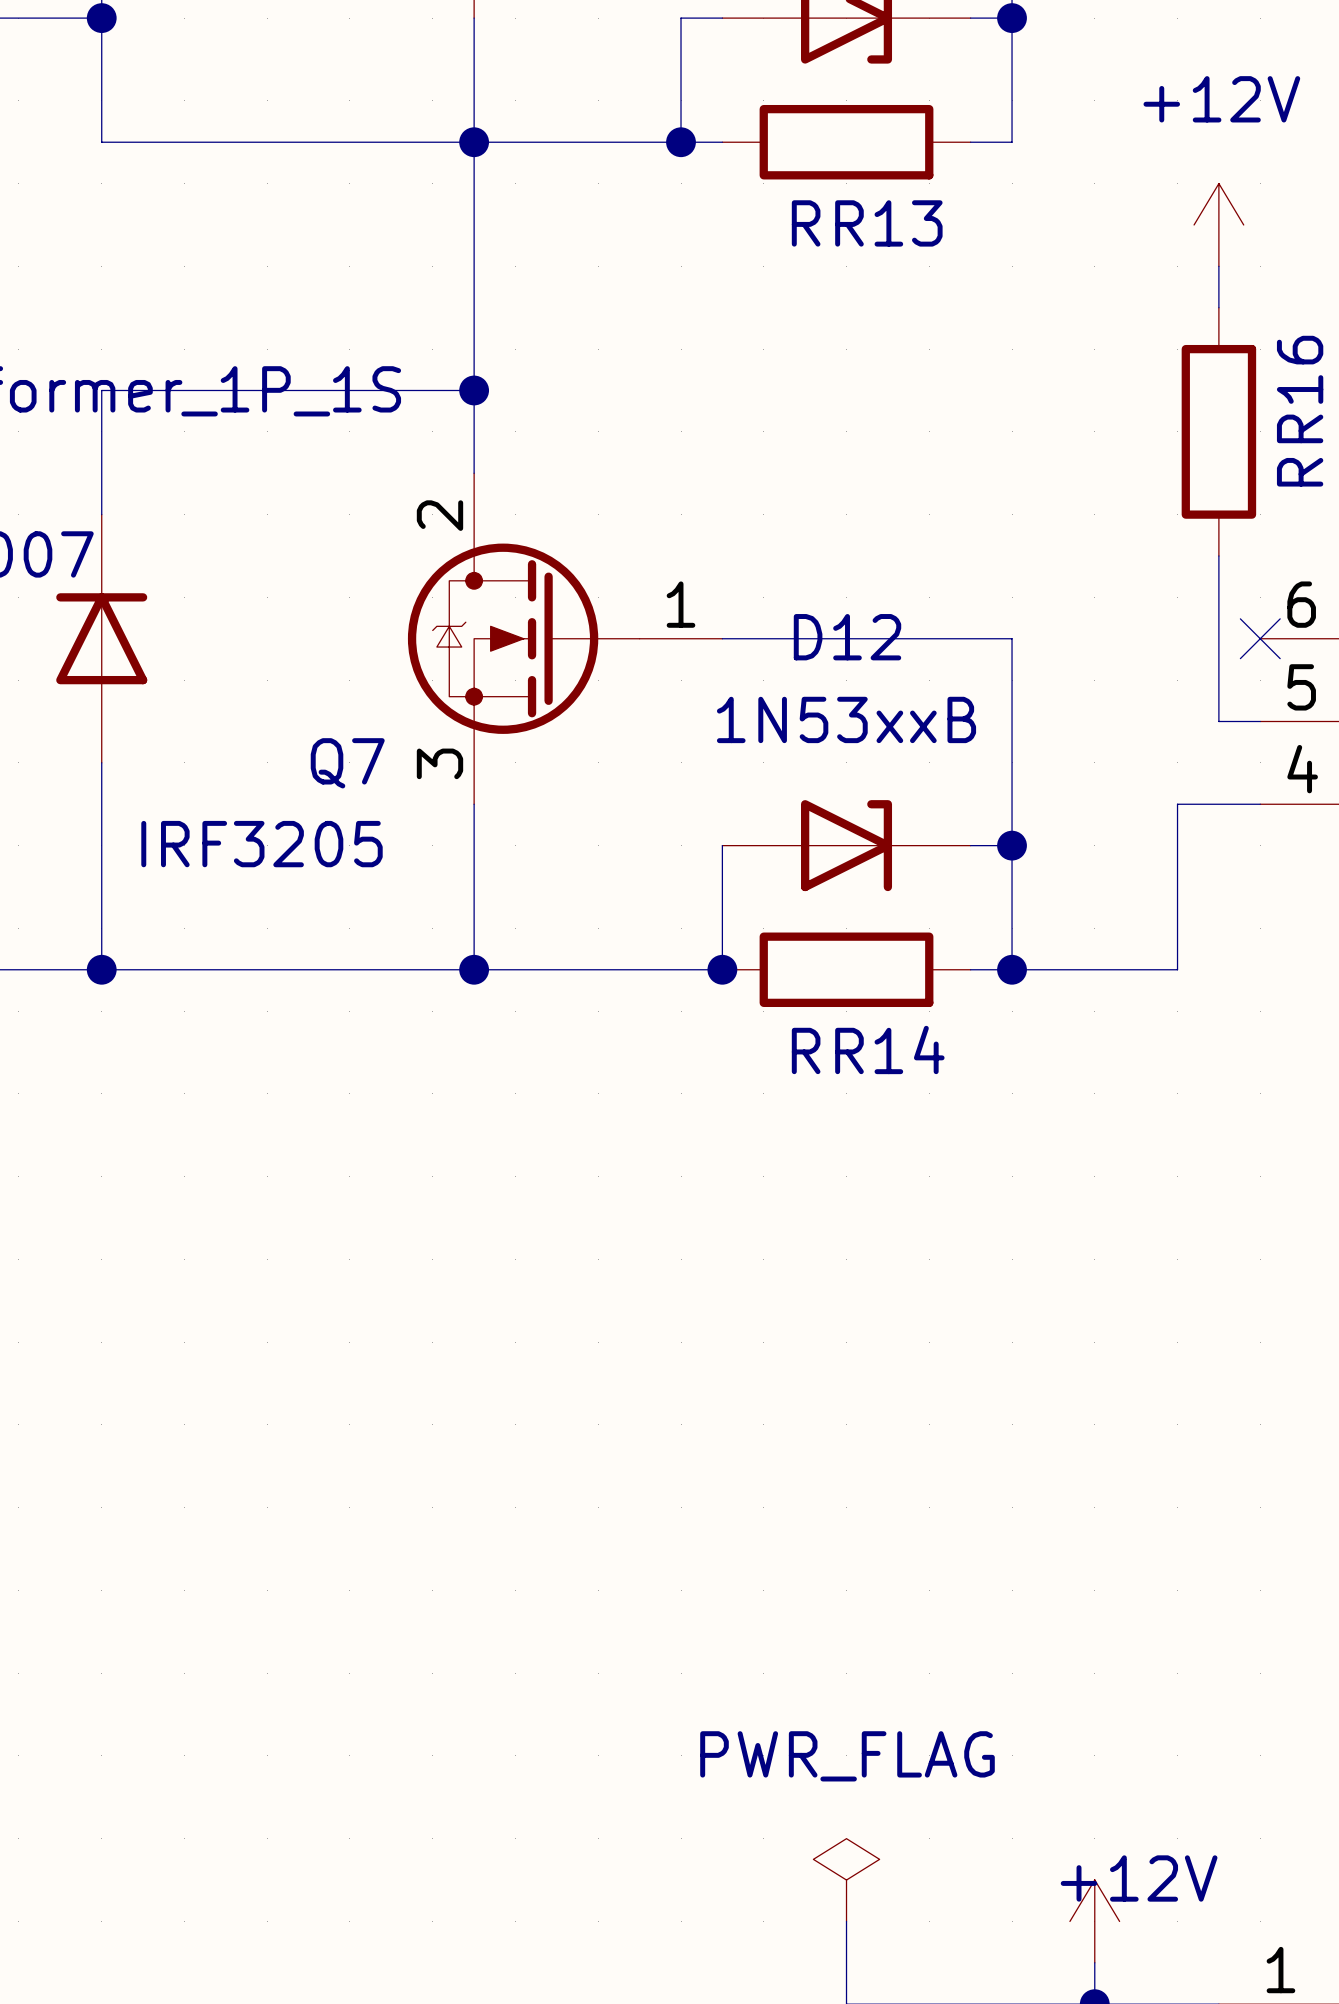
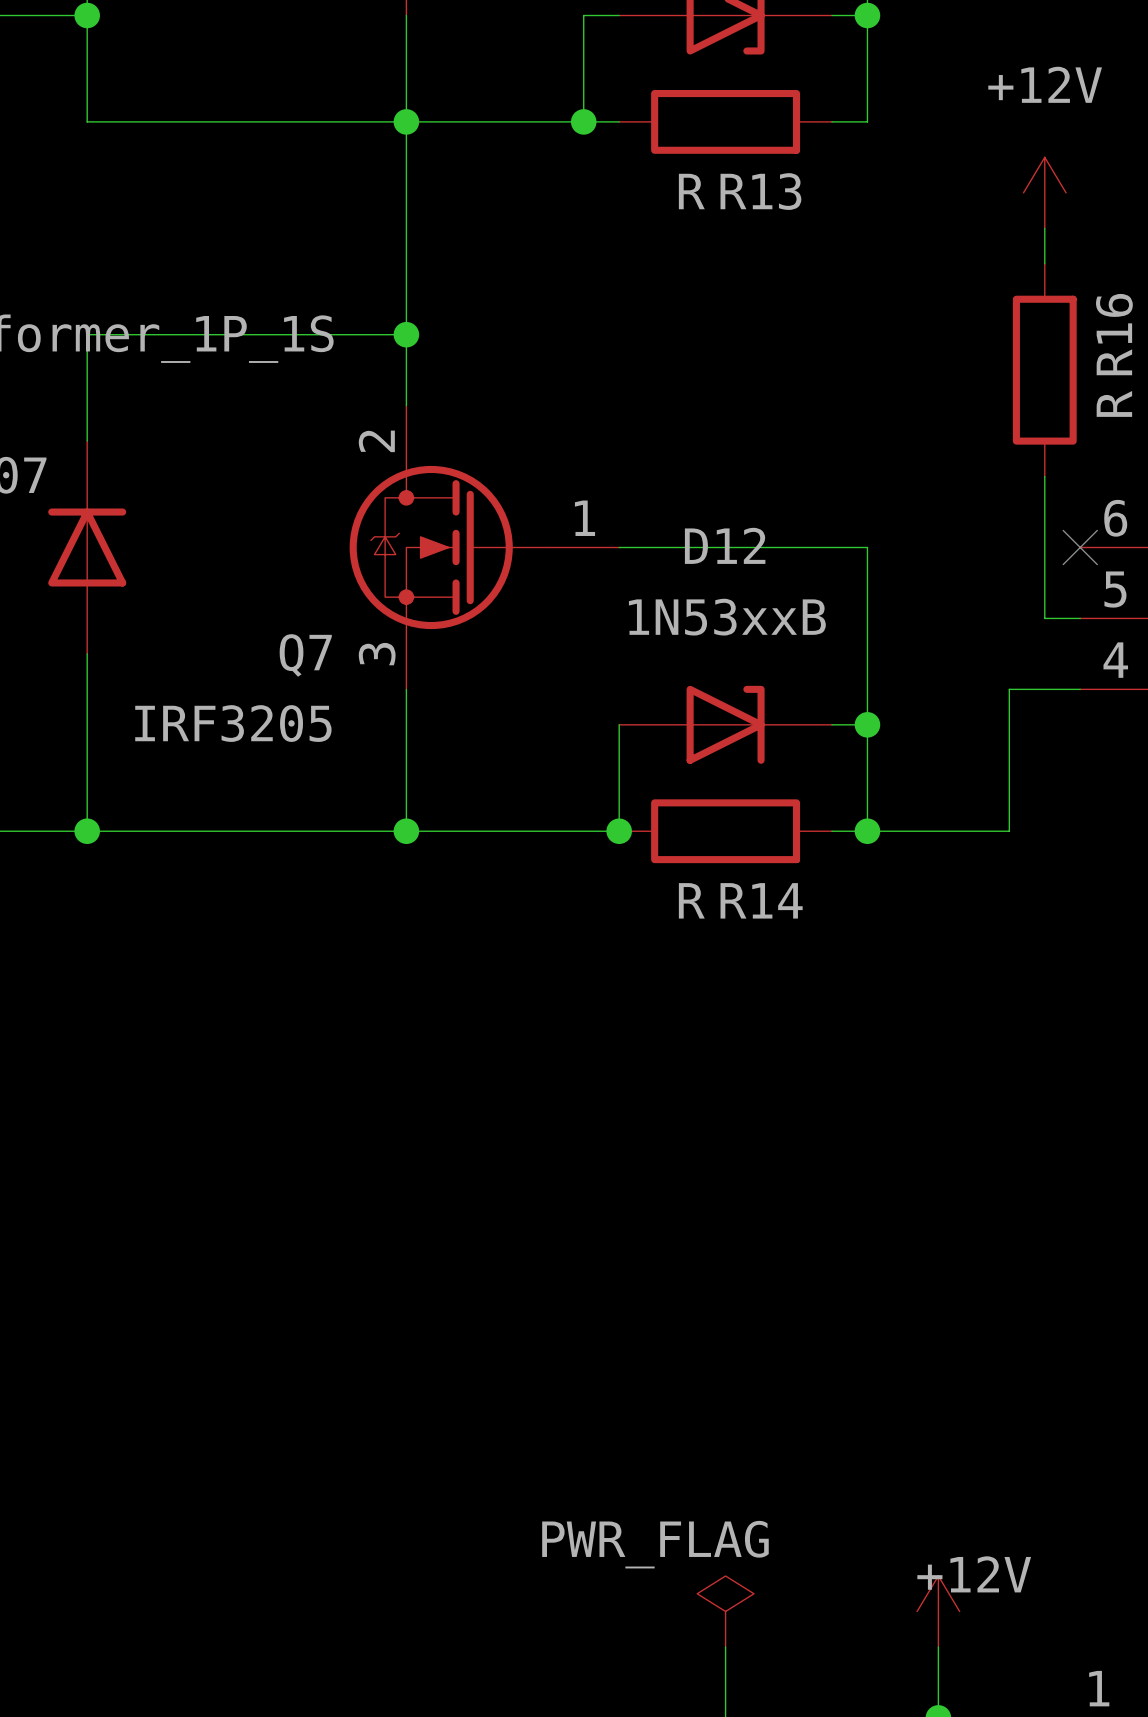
power symbol text position: PWR_FLAG (847, 1756) -> PWR_FLAG (655, 1544)
power symbol position: +12V (1094, 1921) -> +12V (938, 1611)

